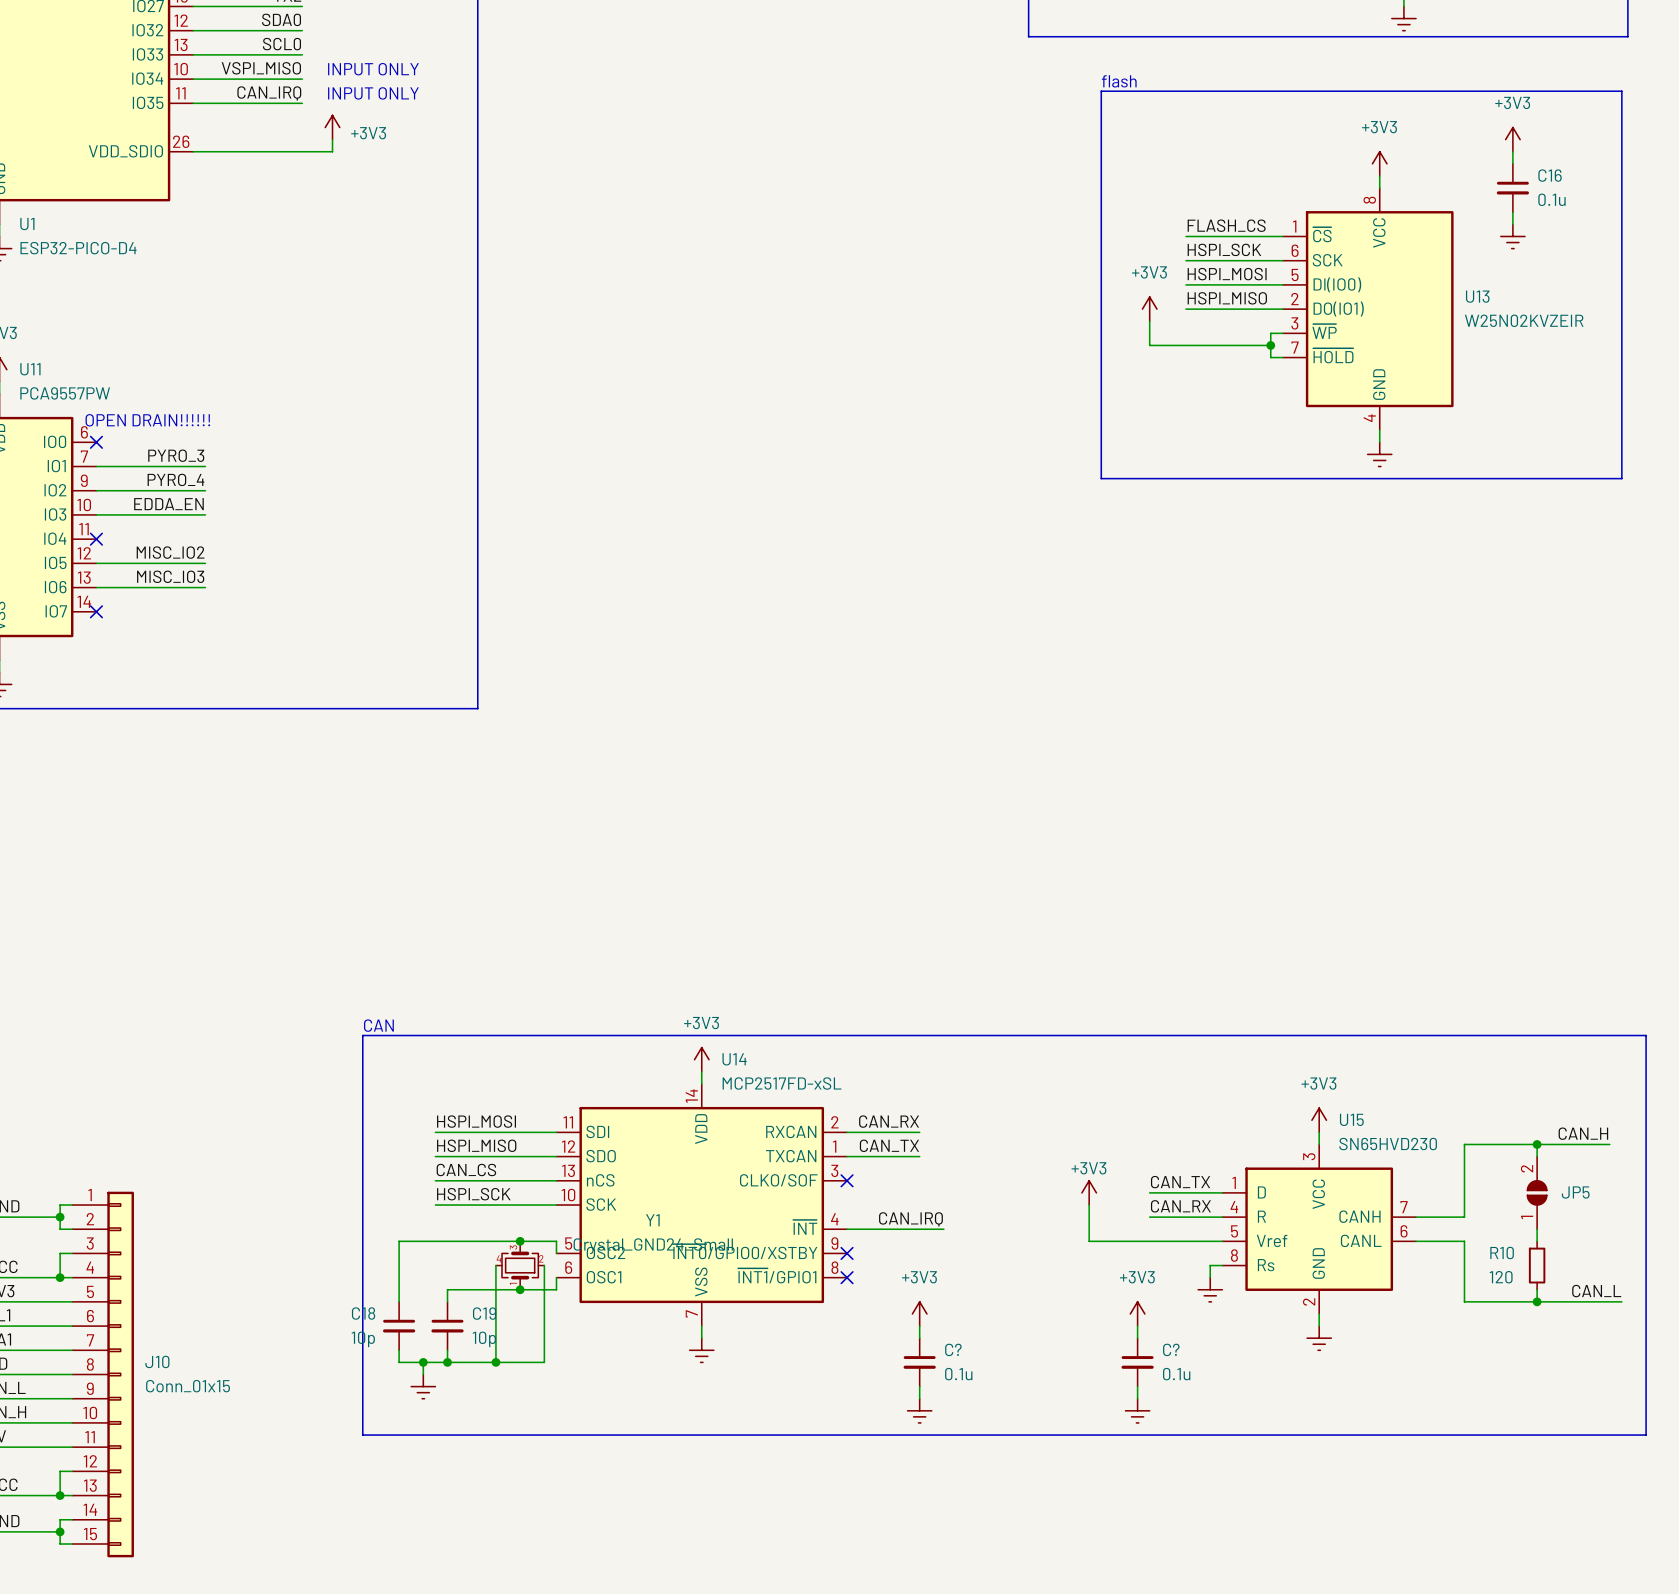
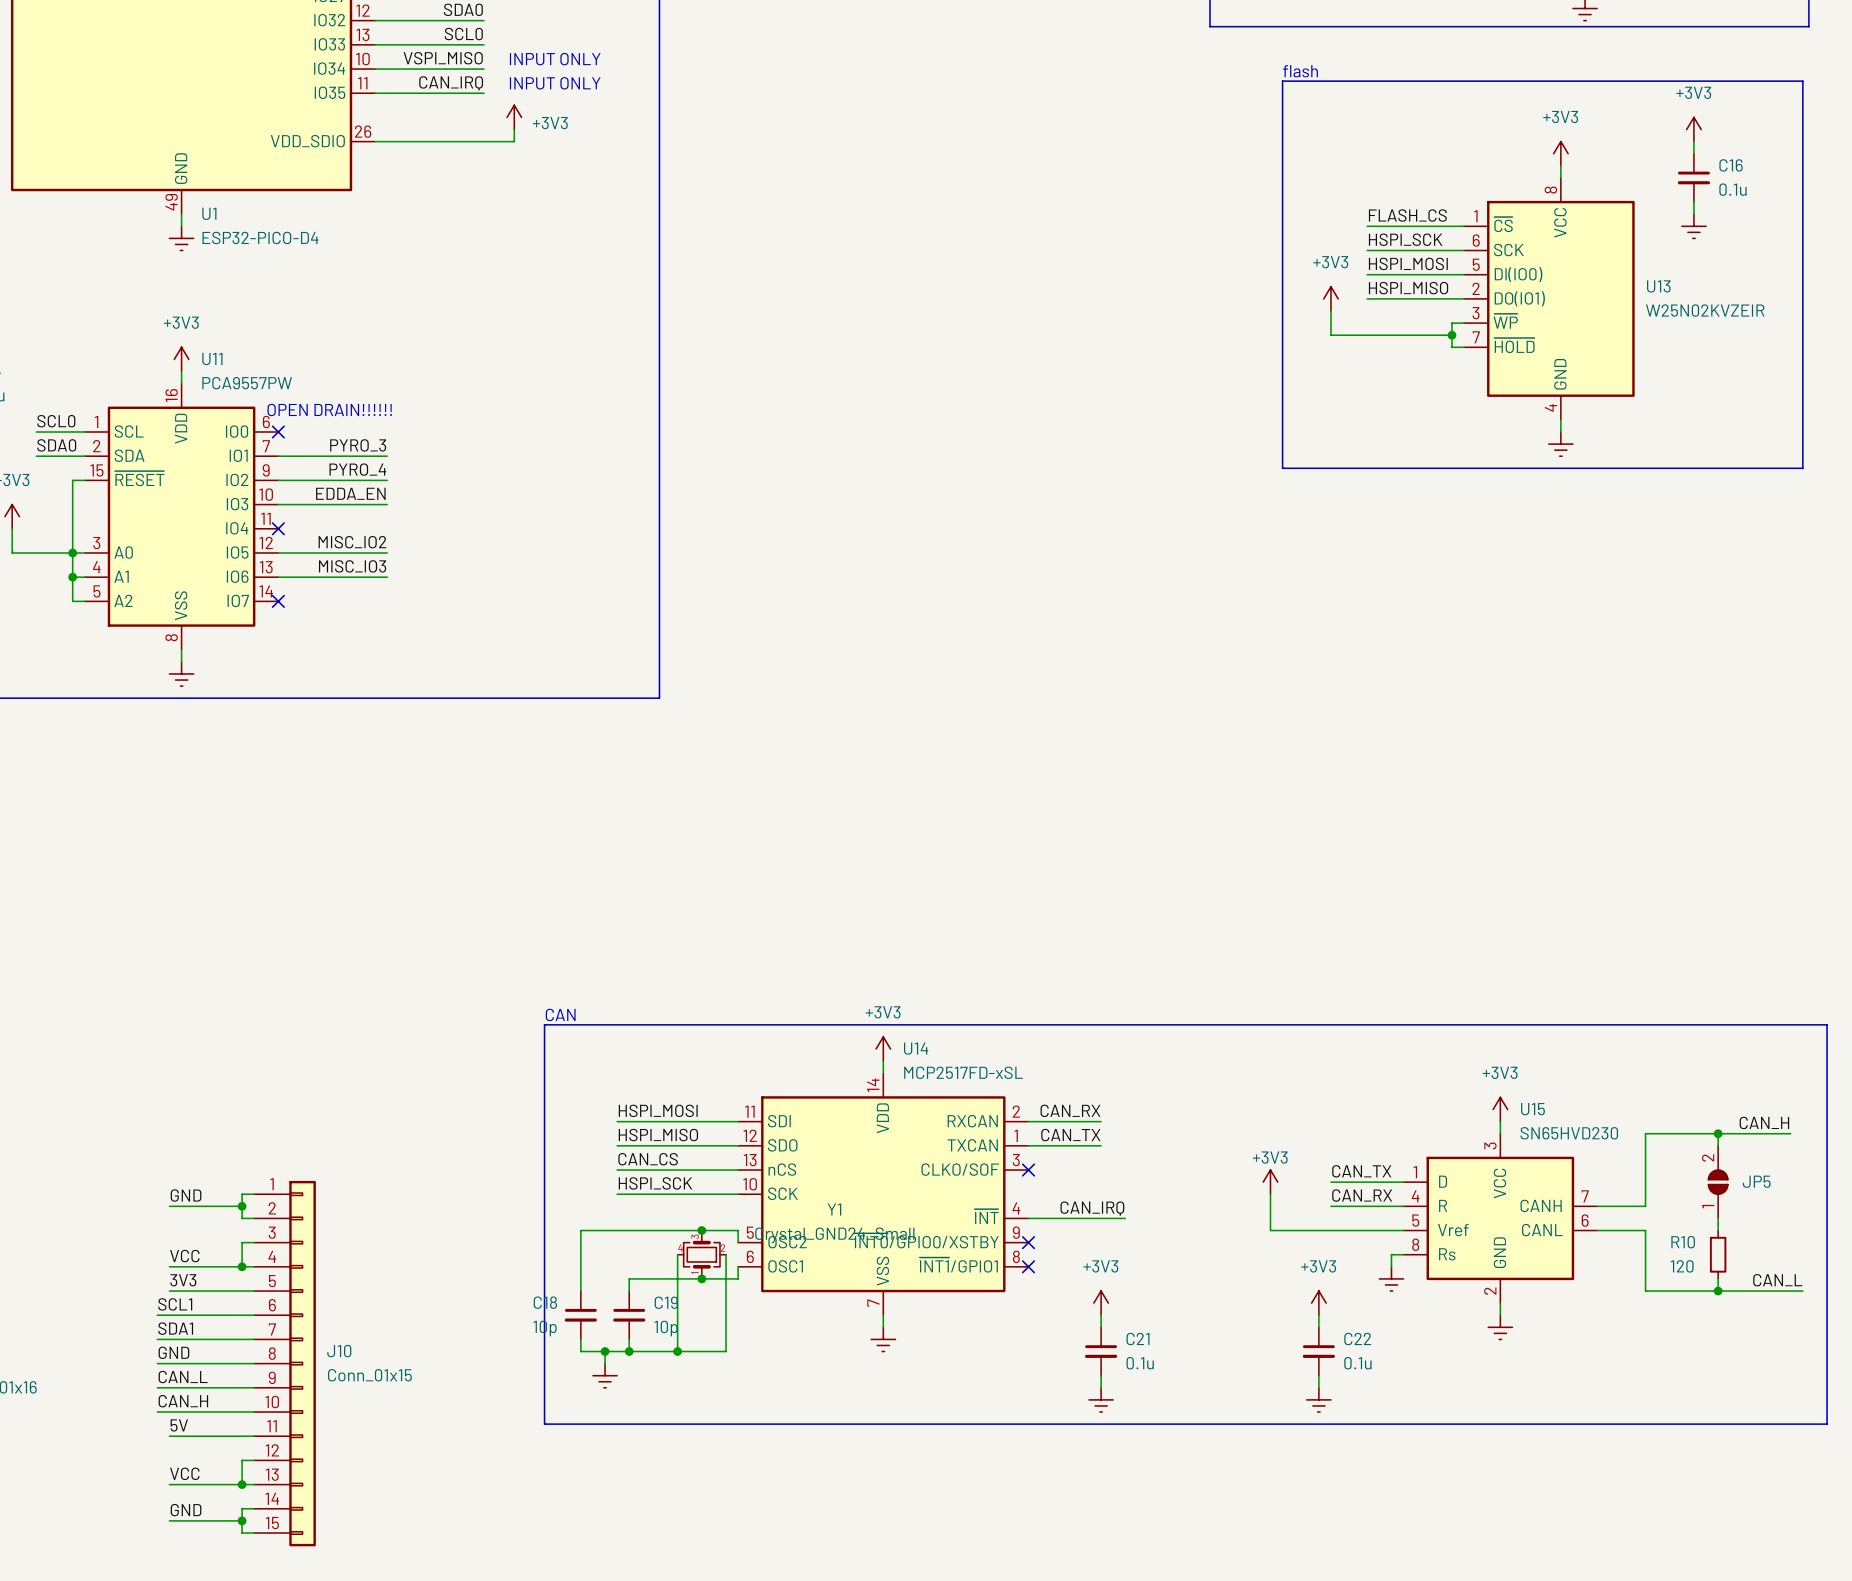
C? name: C? (953, 1349) -> C21 (1138, 1339)
C? name: C? (1171, 1349) -> C22 (1357, 1339)

